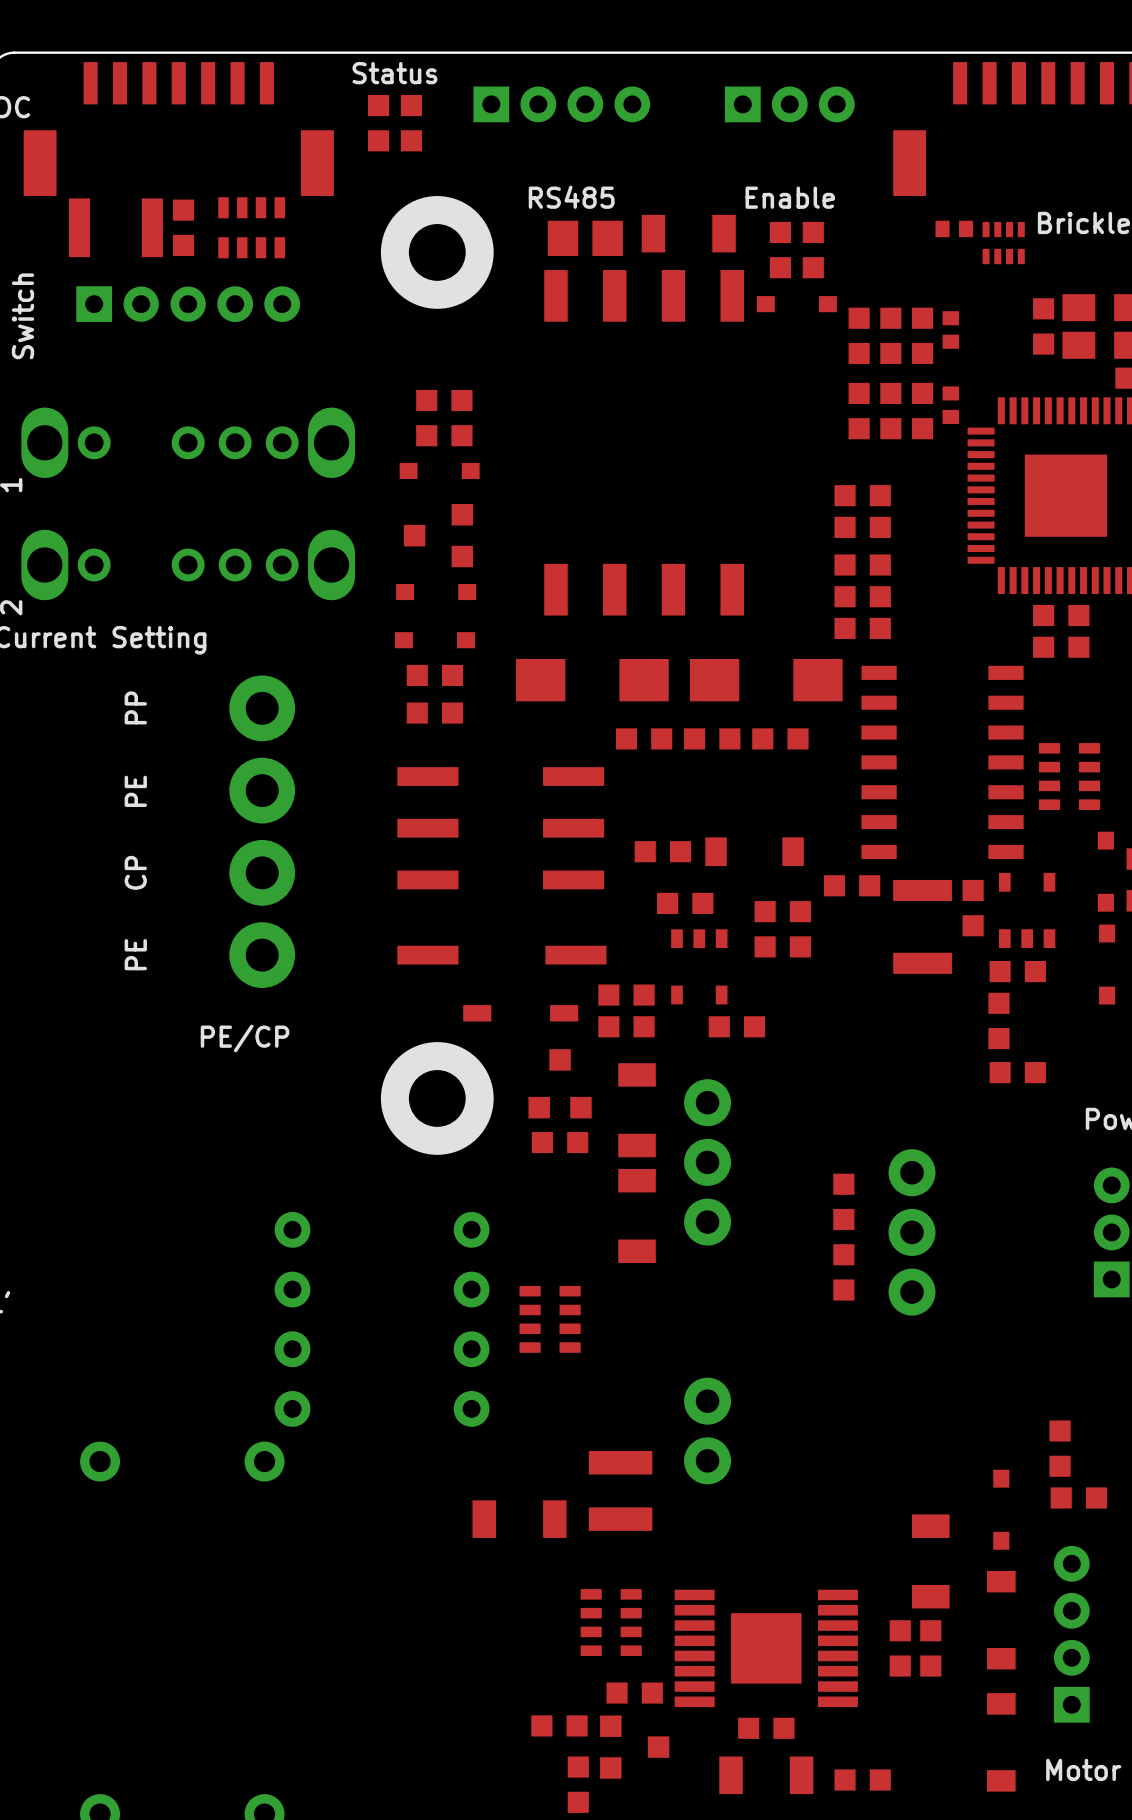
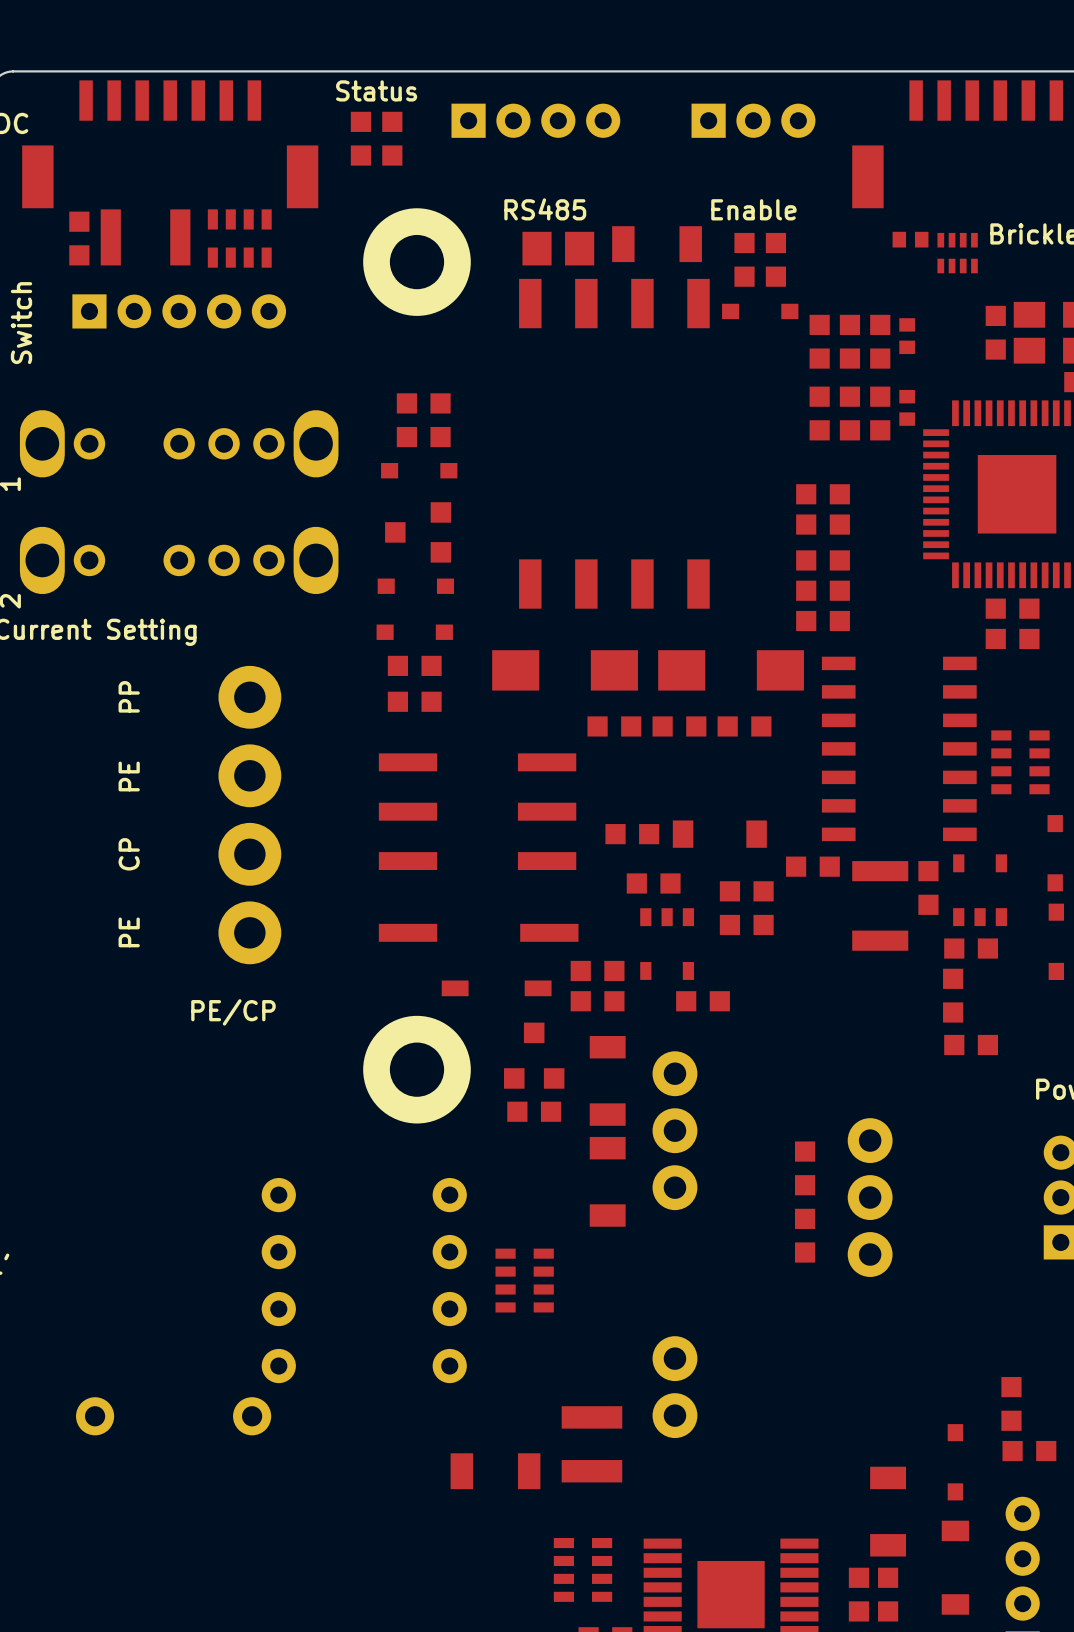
part position: (115, 227) -> (145, 237)
part position: (183, 227) -> (79, 238)

